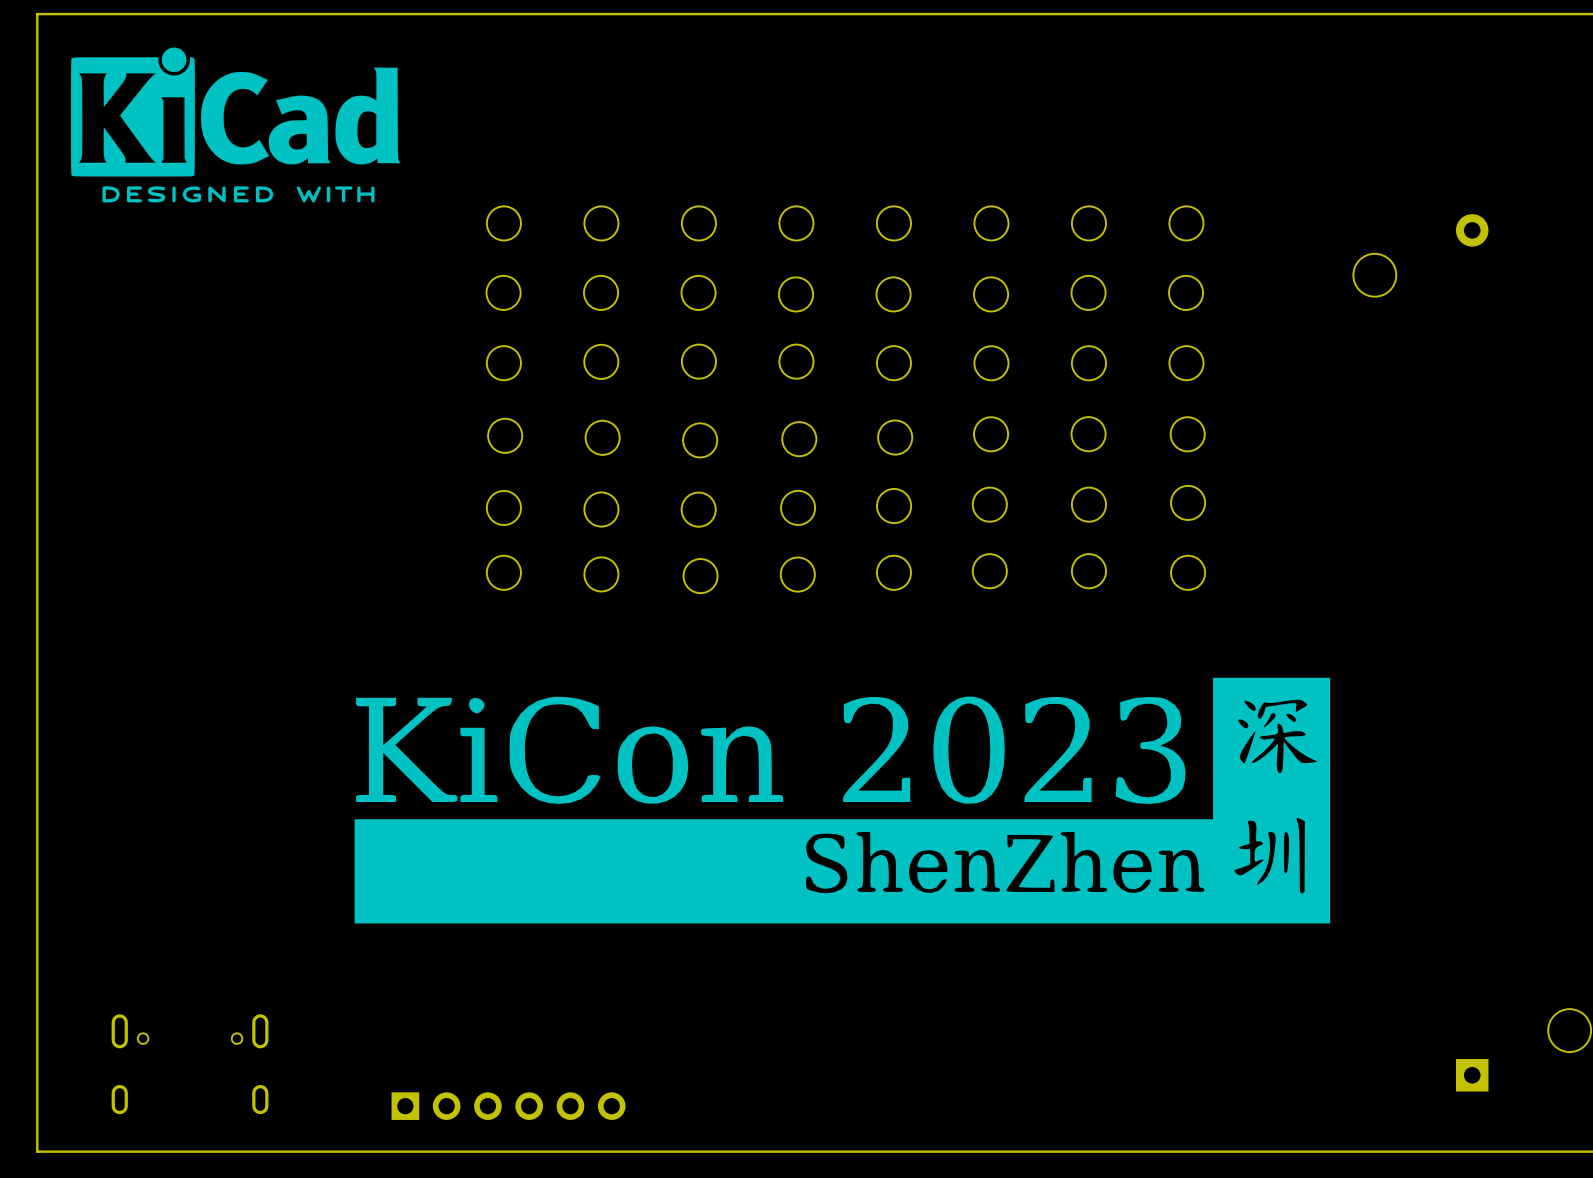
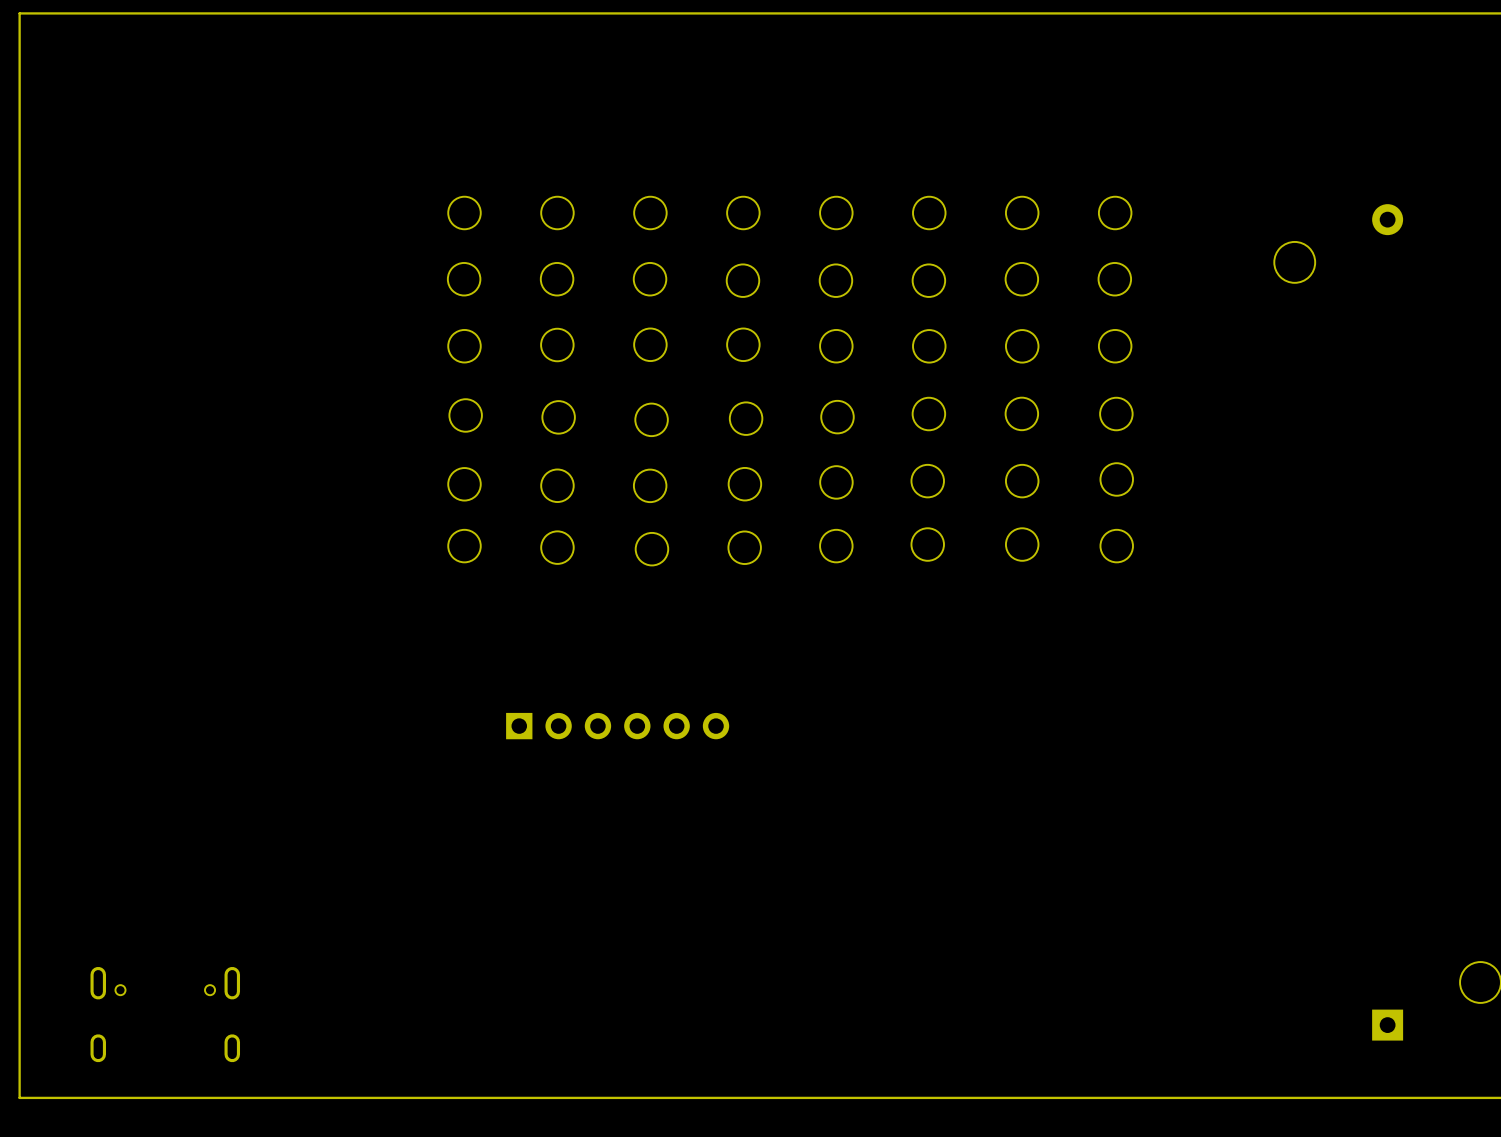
drawing: [70, 47, 401, 203] -> none
drawing: [354, 677, 1331, 924] -> none
part position: (508, 1106) -> (617, 726)

